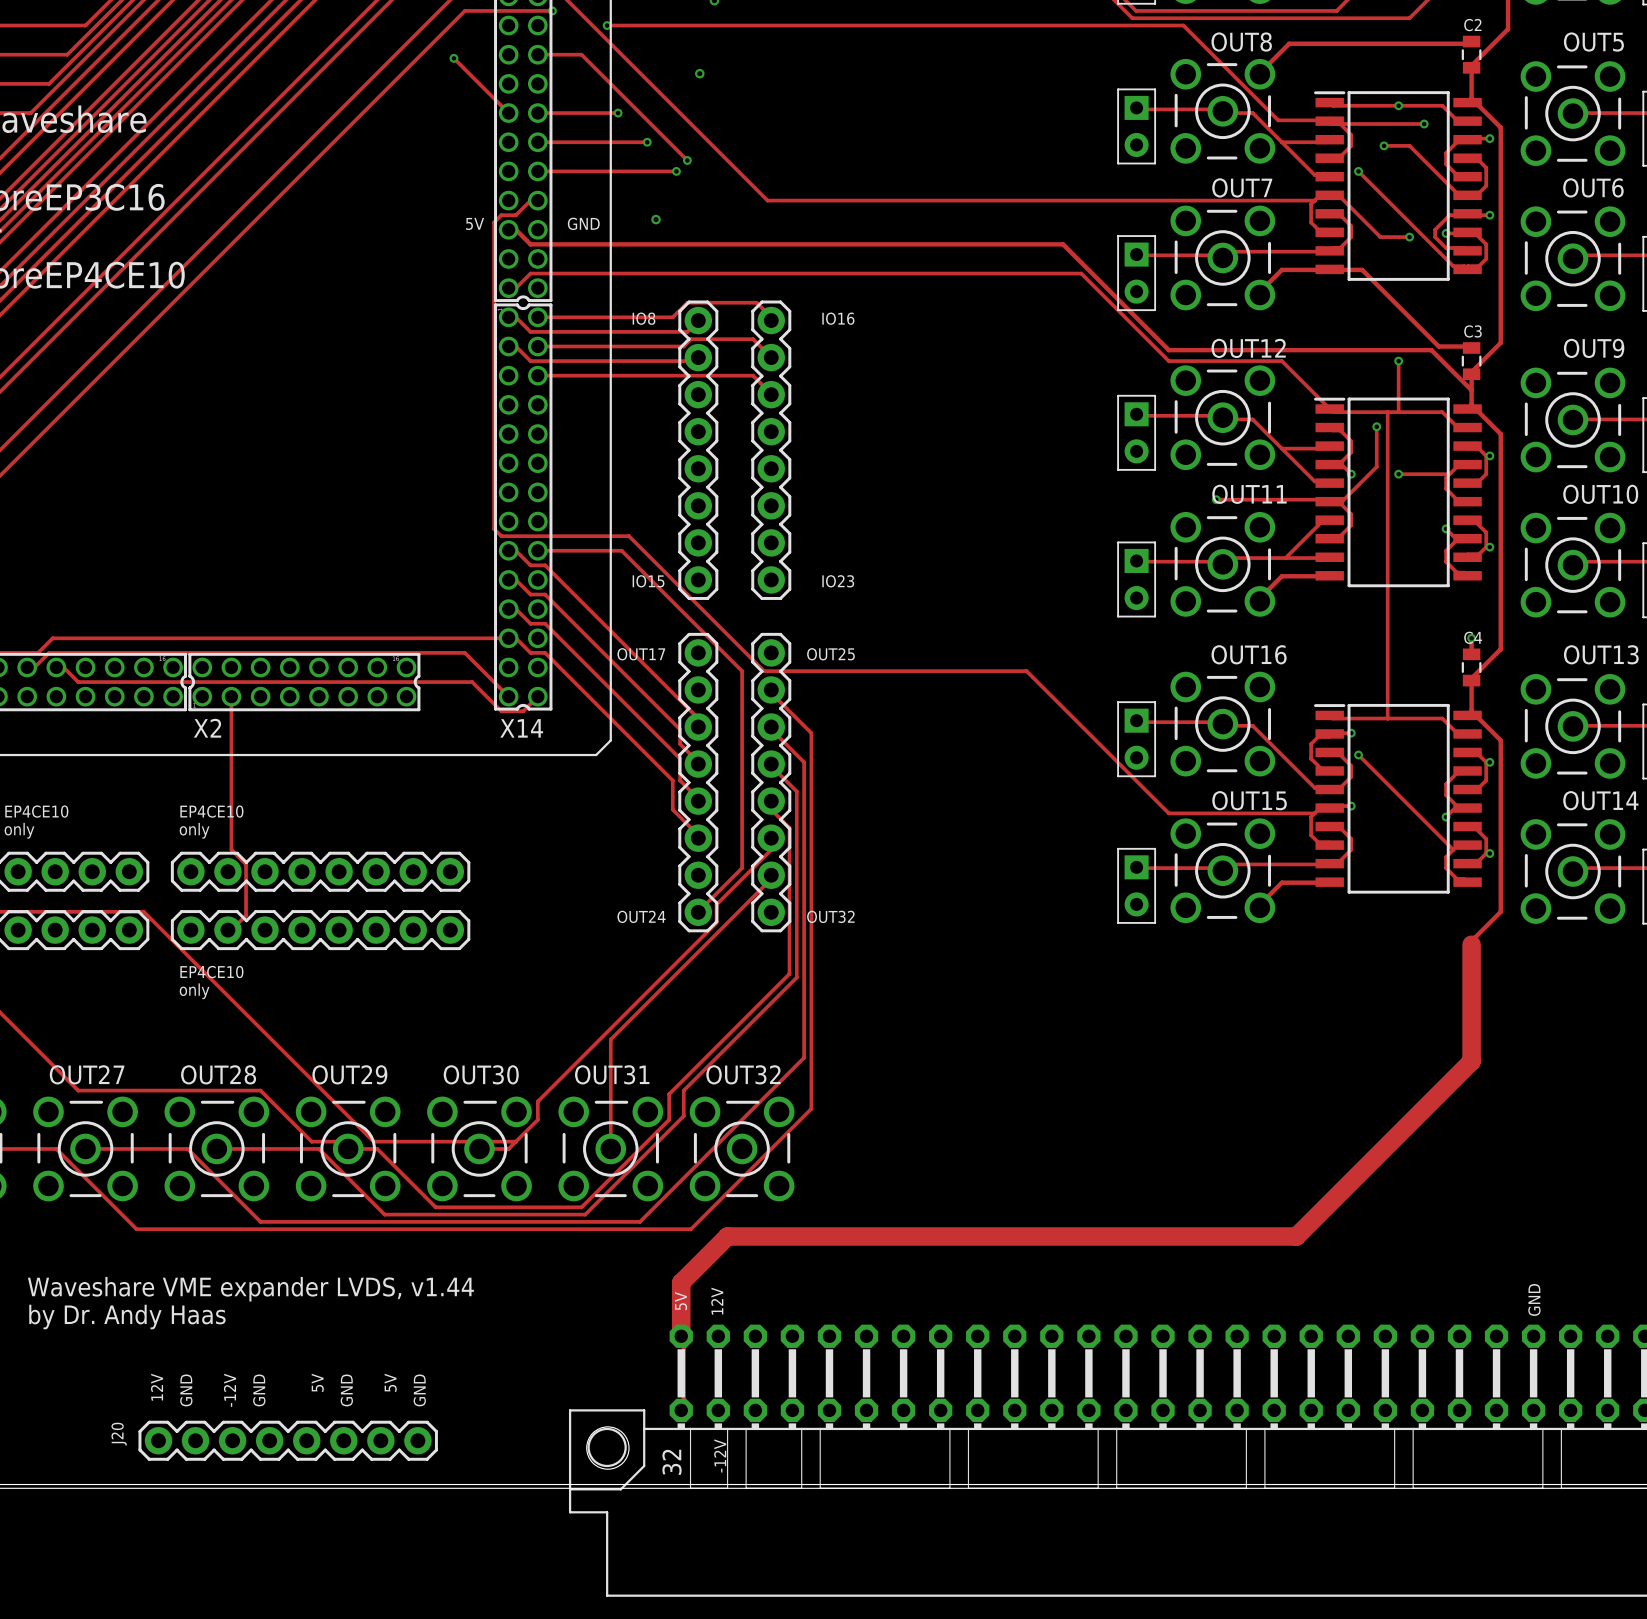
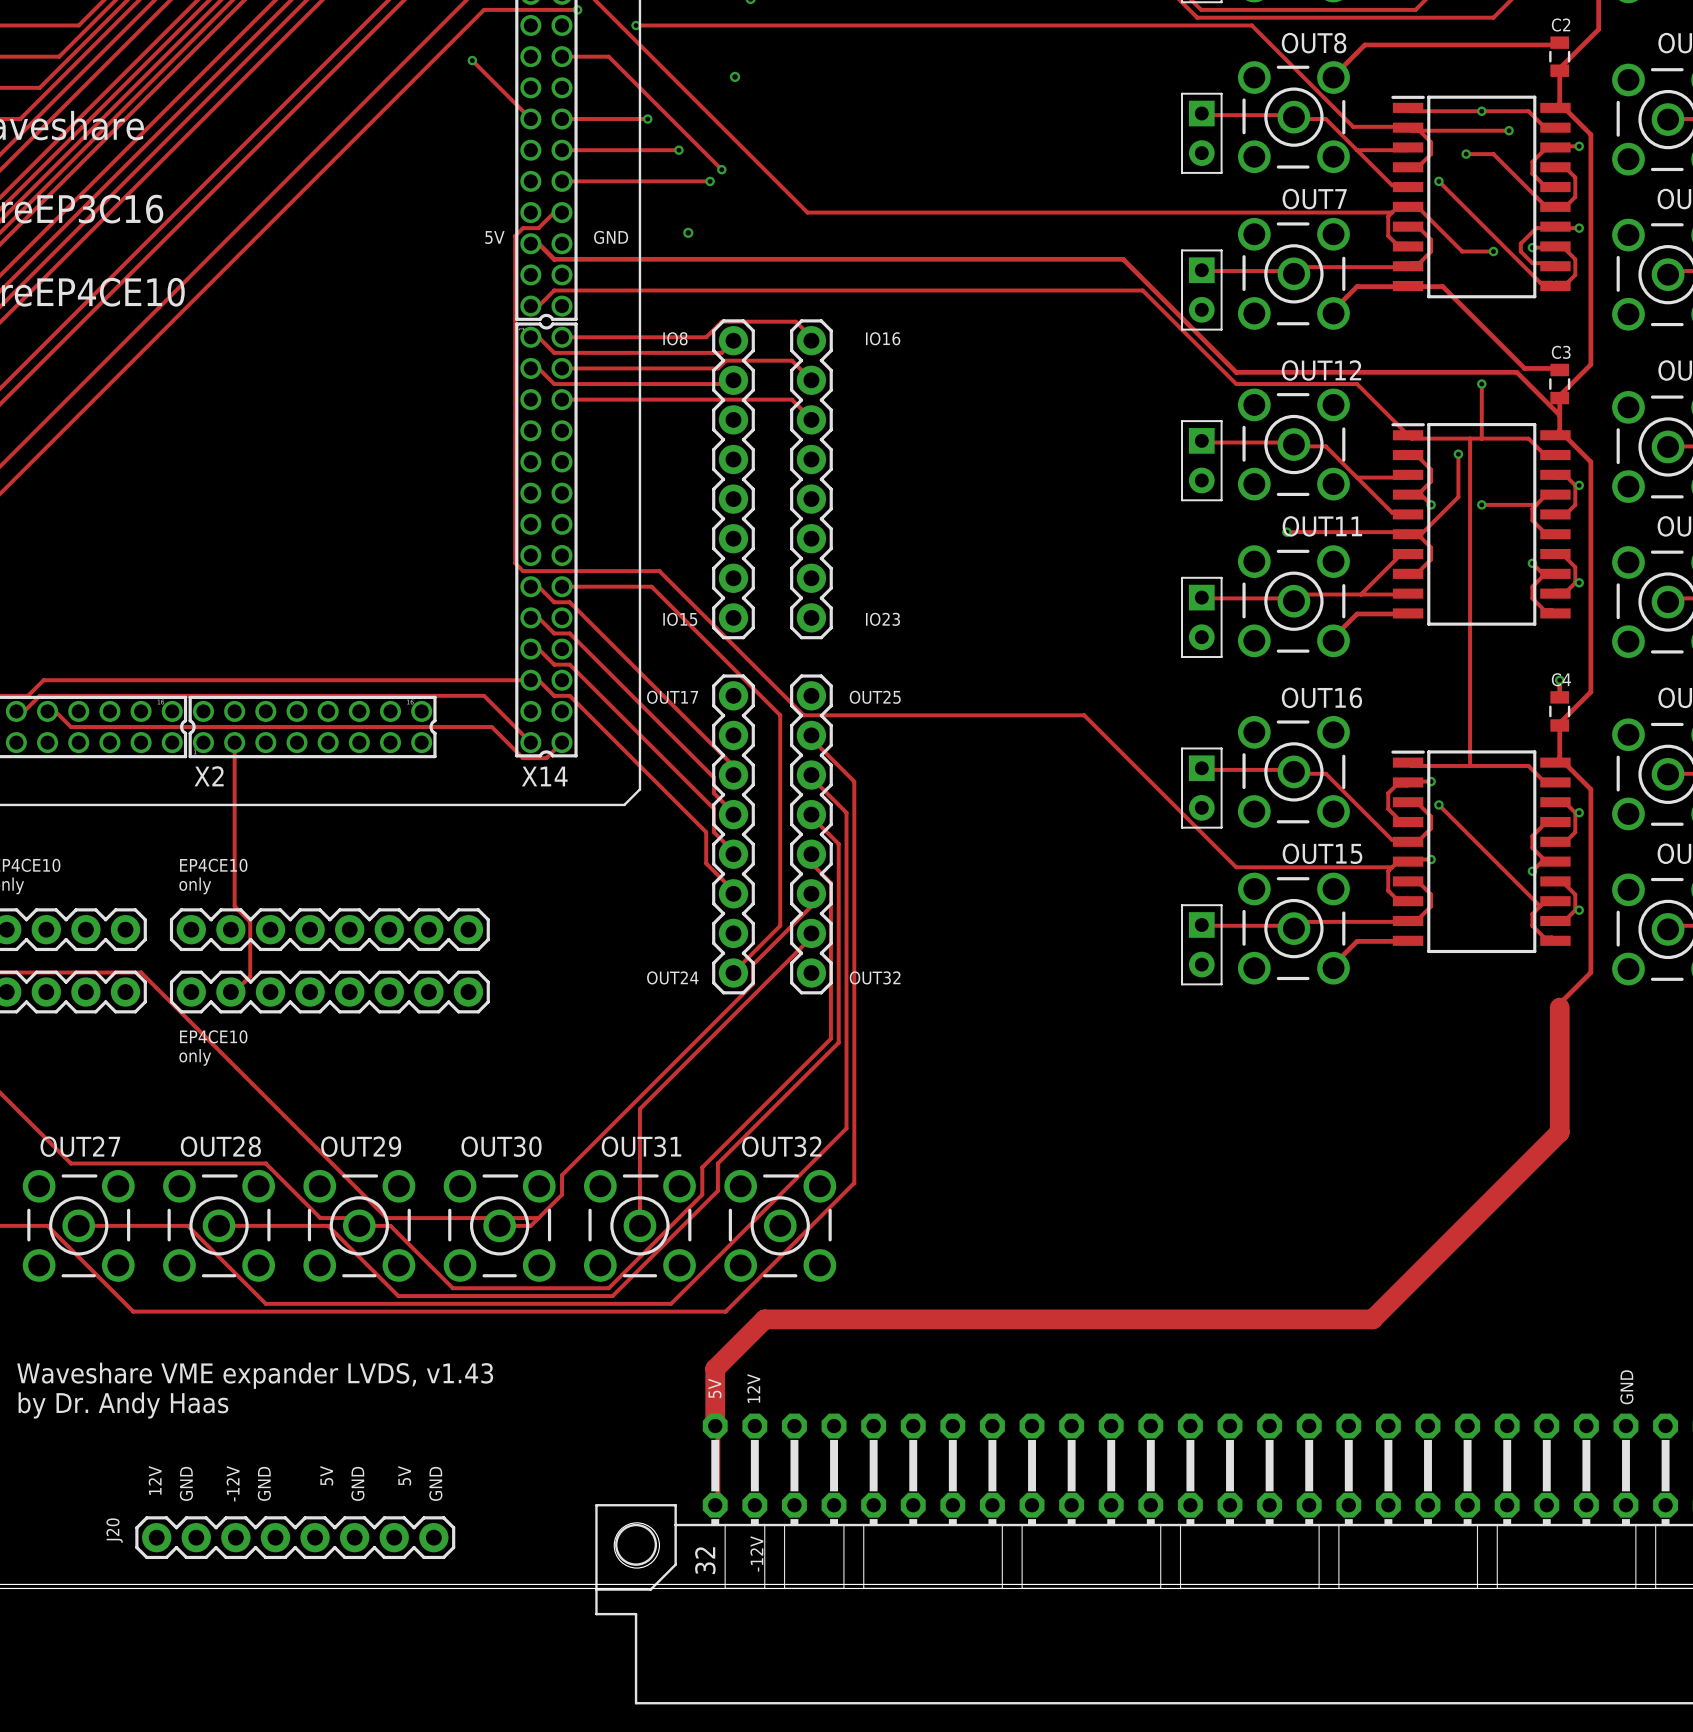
text: Waveshare VME expander LVDS, v1.44 (250, 1289) -> Waveshare VME expander LVDS, v1.43 (255, 1375)

